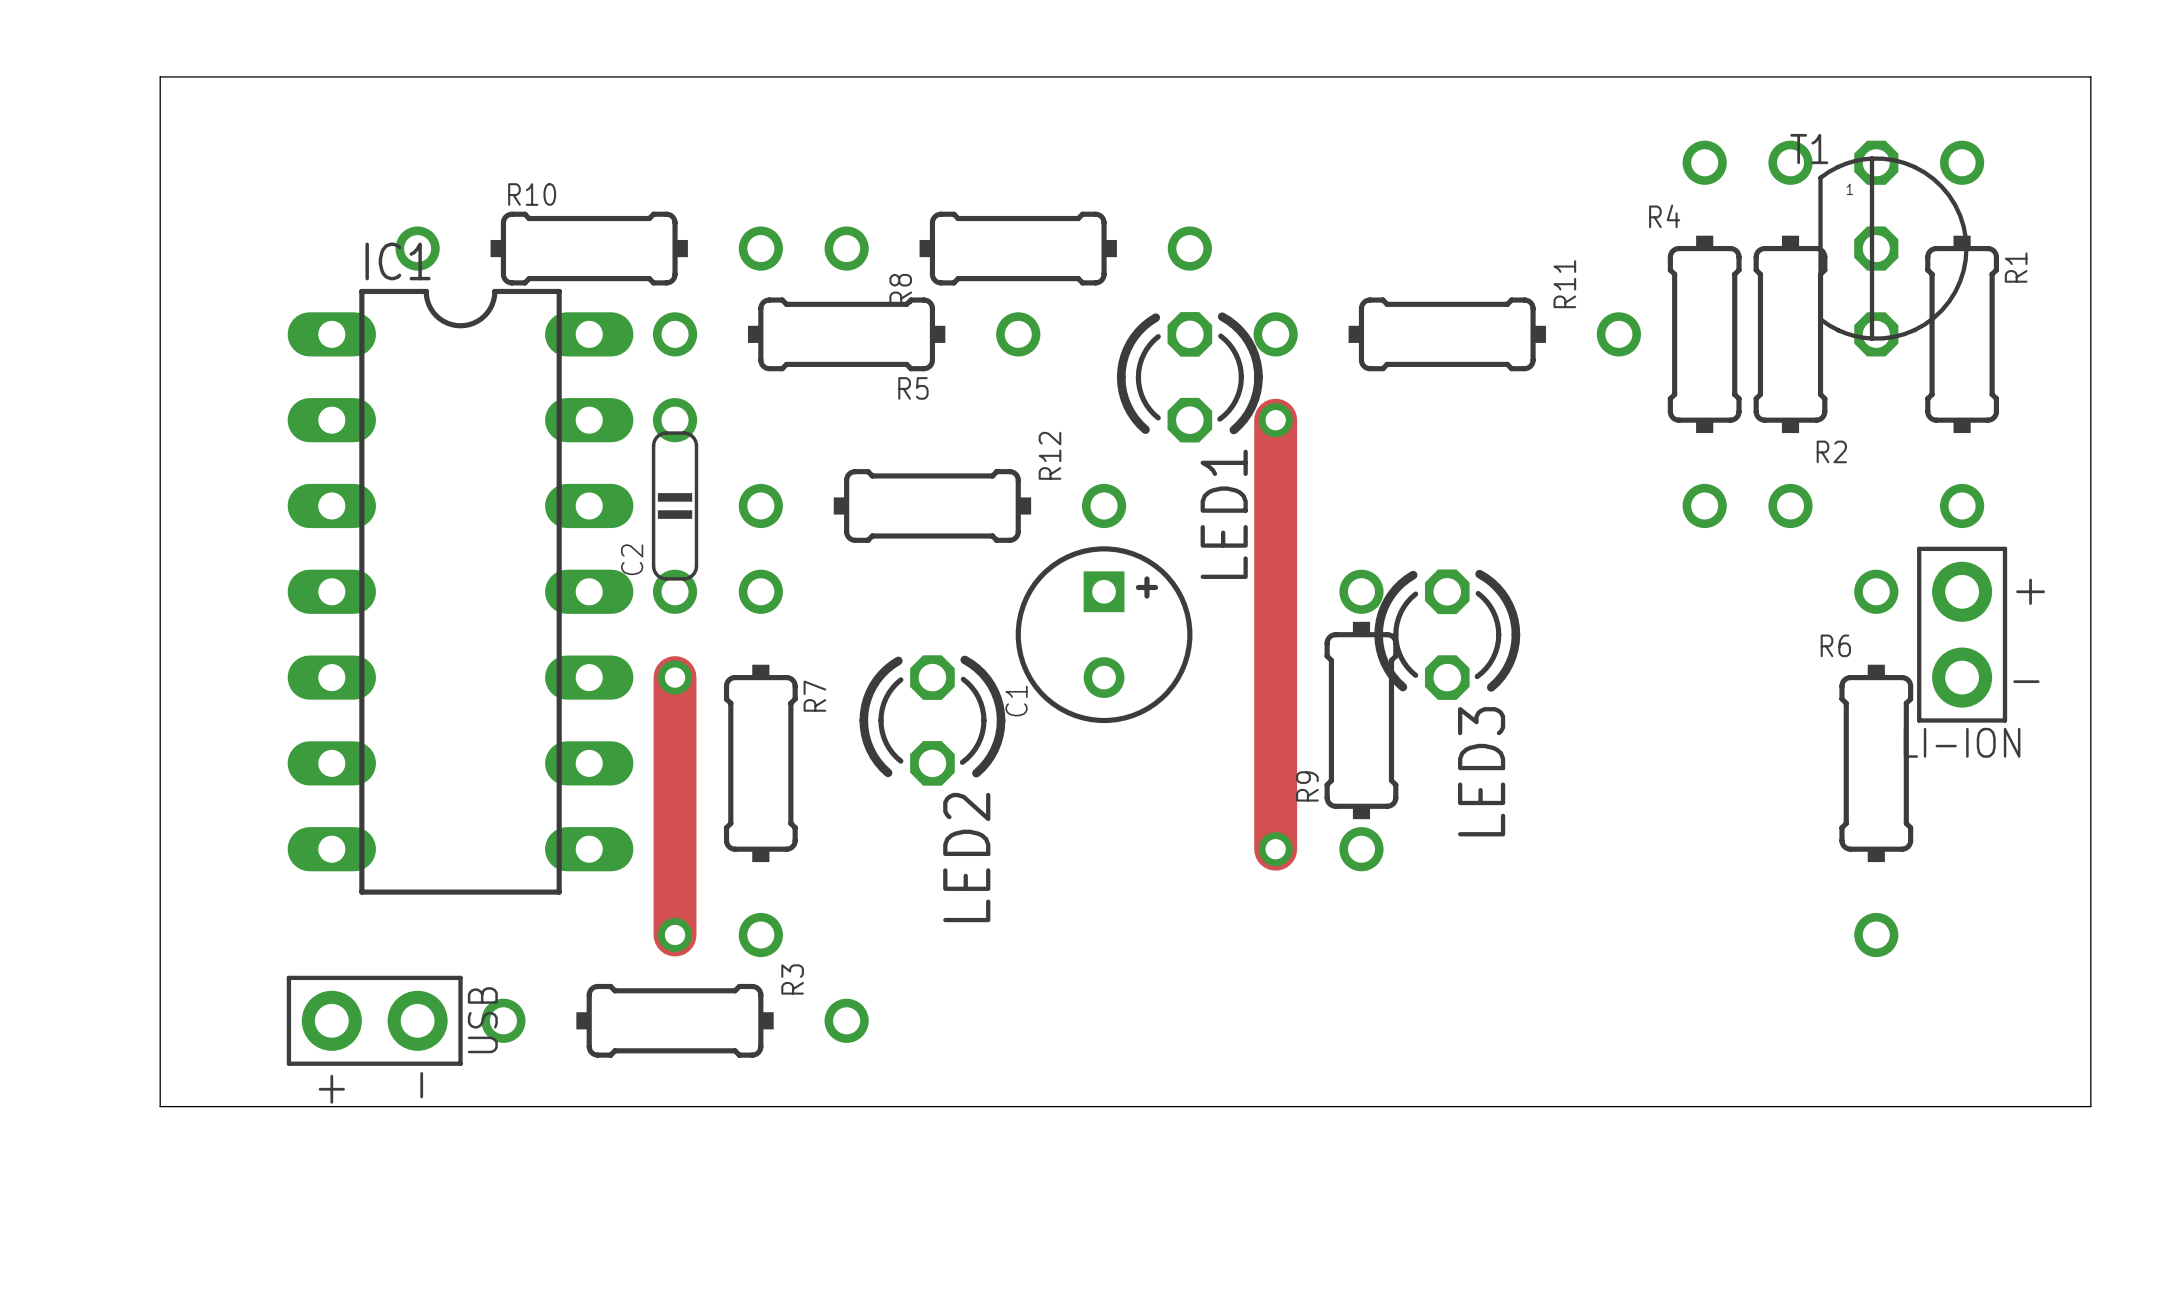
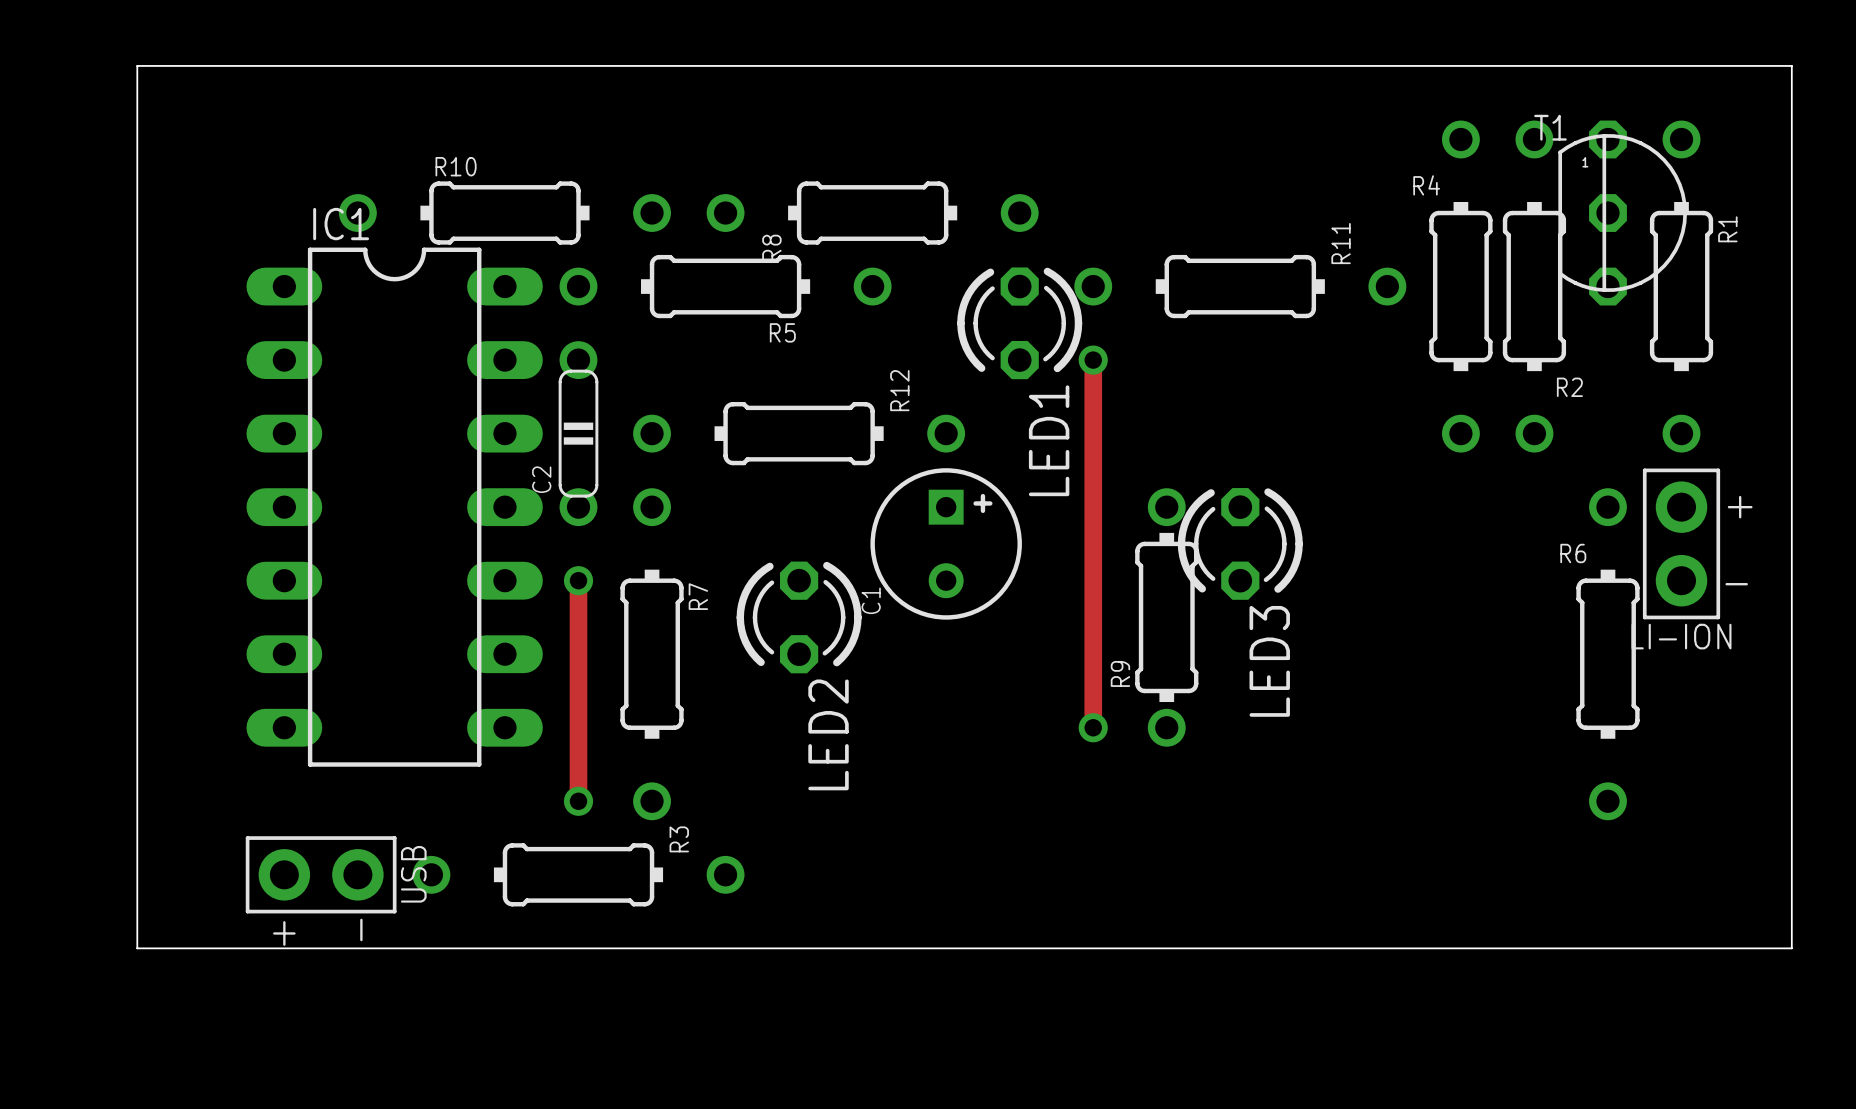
track width: thick (1275, 420) (1275, 849) -> thin (1093, 360) (1093, 727)
track width: thick (675, 677) (675, 935) -> thin (578, 580) (578, 801)

